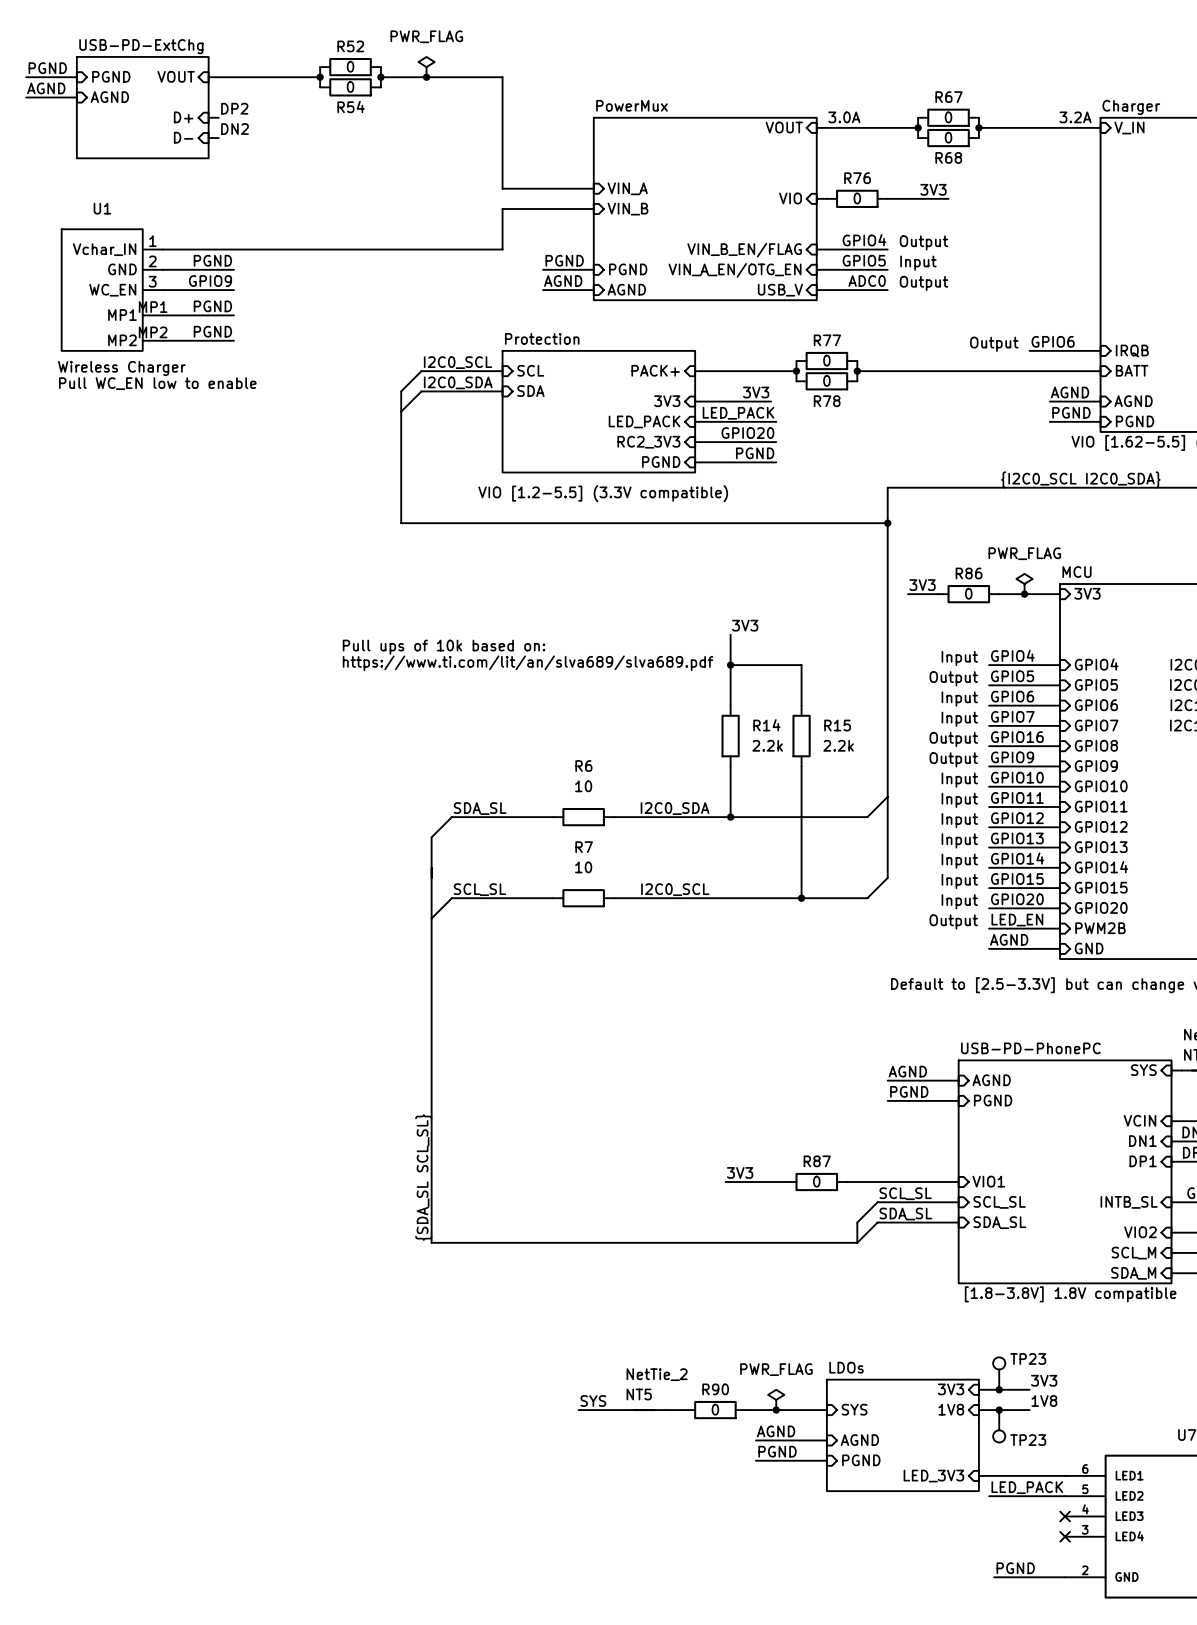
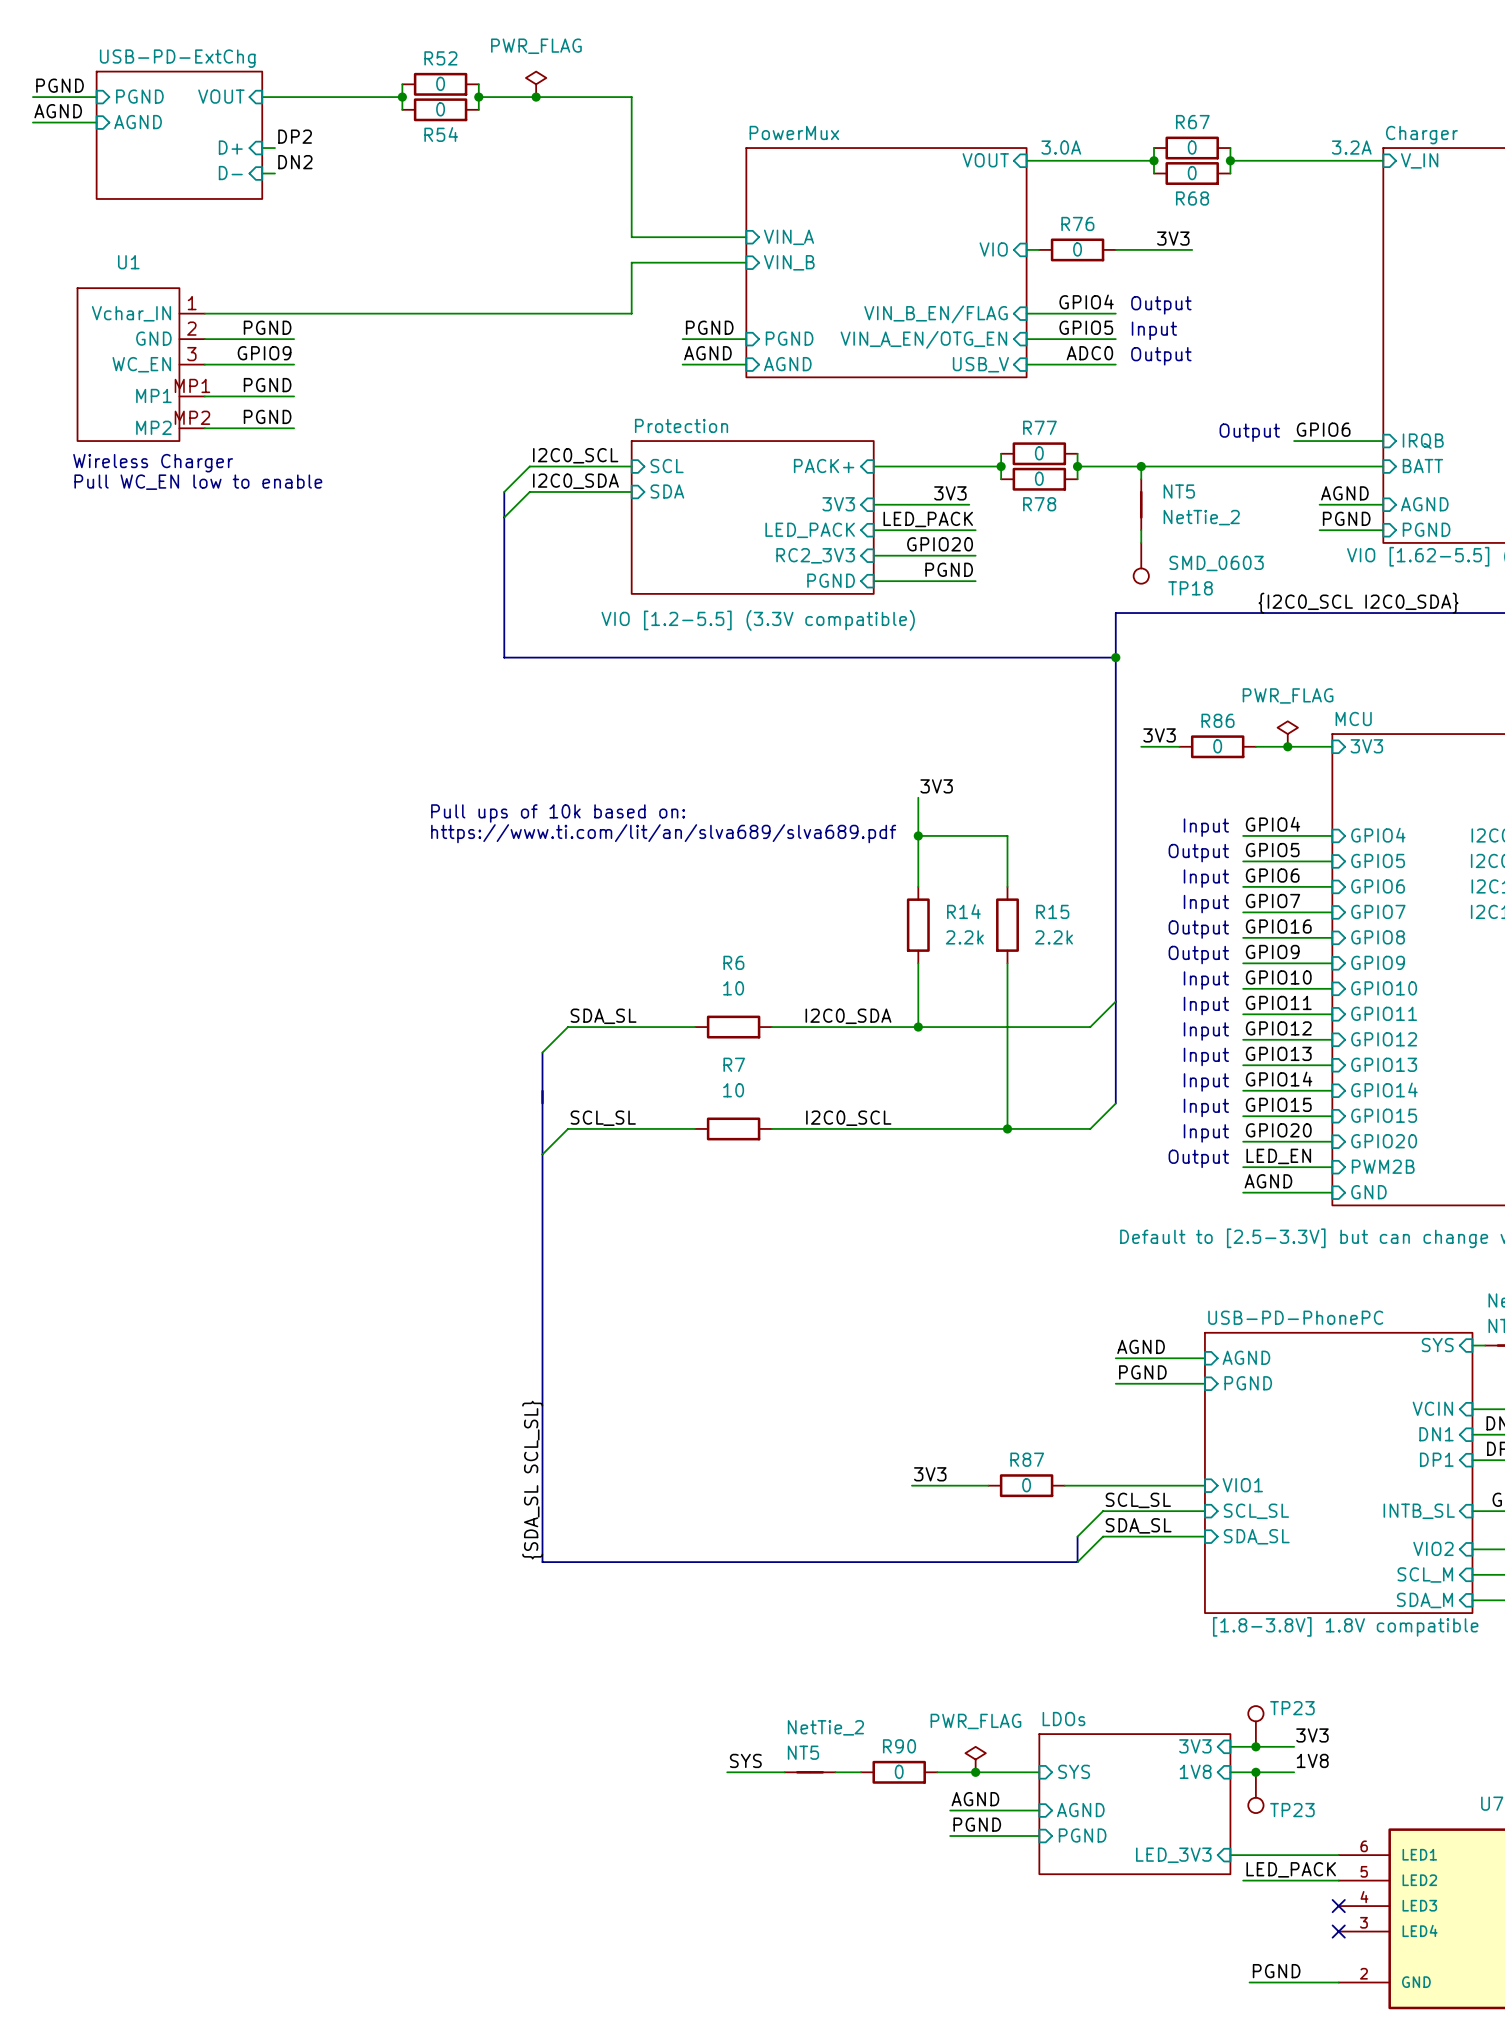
wire: none -> (1141, 466) (1141, 479)
junction: none -> (1141, 466)
NT5: none -> NetTie_2 (1141, 504)
wire: none -> (1141, 530) (1141, 542)
TP18: none -> SMD_0603 (1141, 563)

